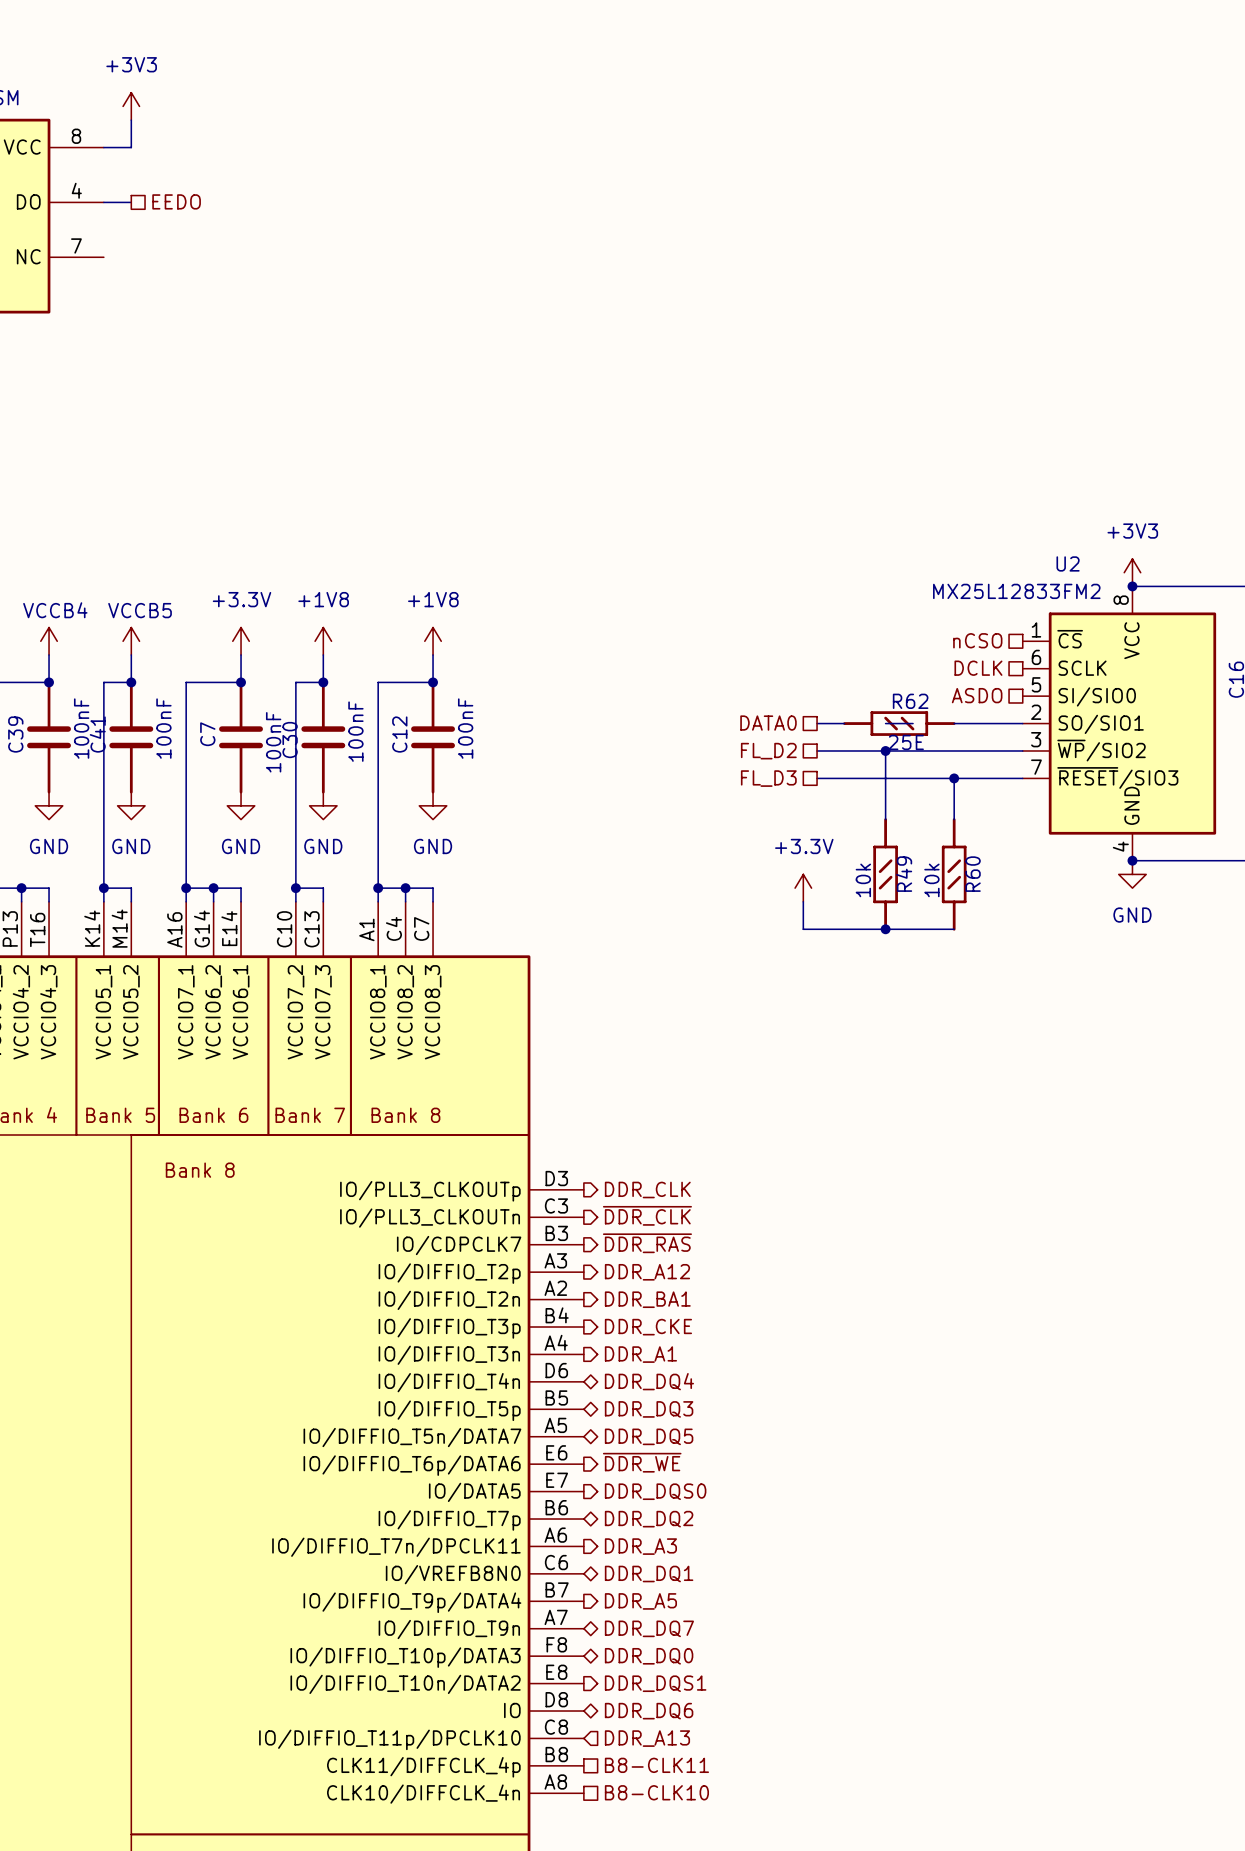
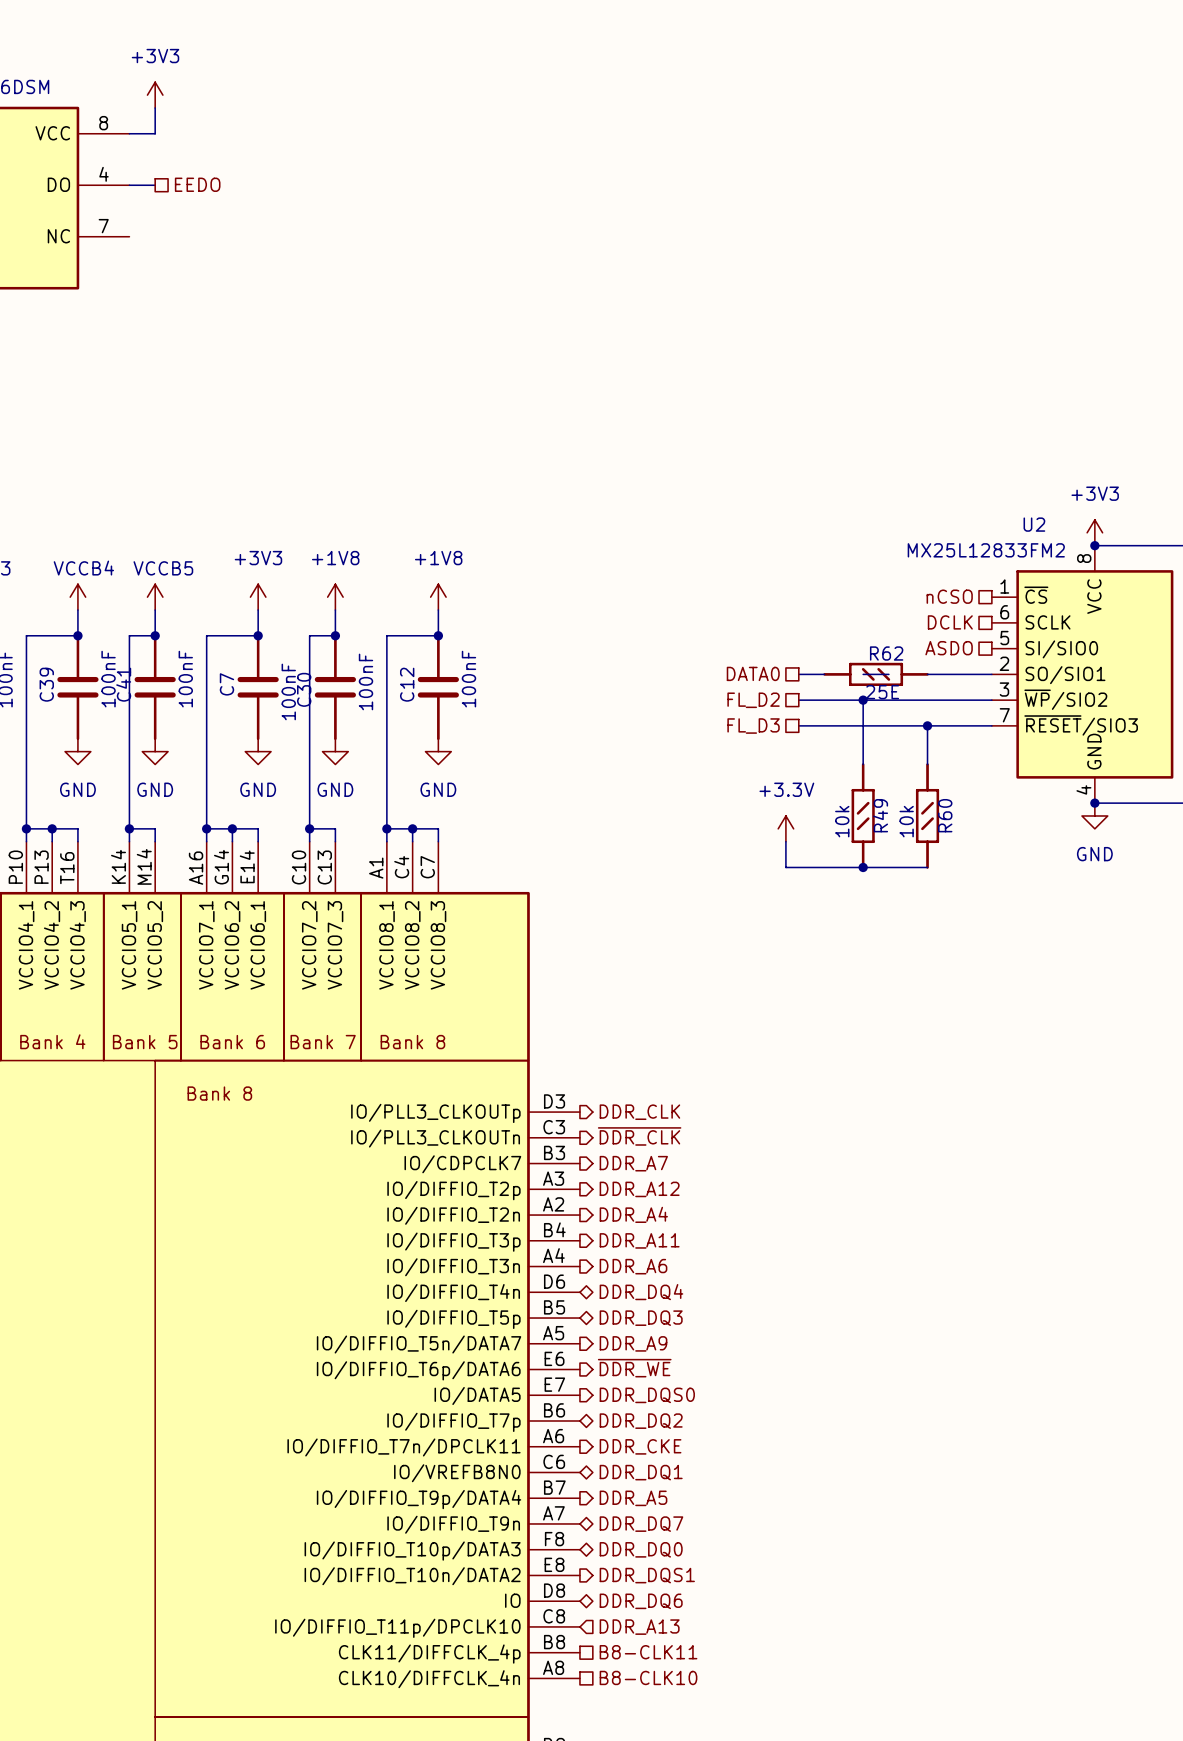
power symbol: +3.3V (241, 641) -> +3V3 (258, 597)
hierarchical label: ~{DDR_RAS} (647, 1243) -> DDR_A7 (633, 1163)
hierarchical label: DDR_BA1 (647, 1299) -> DDR_A4 (633, 1214)
hierarchical label: DDR_CKE (648, 1327) -> DDR_A11 (639, 1240)
hierarchical label: DDR_A1 (640, 1354) -> DDR_A6 (633, 1266)
hierarchical label shape: bidirectional (649, 1436) -> output (633, 1343)
hierarchical label: DDR_DQ5 (649, 1436) -> DDR_A9 (633, 1343)
hierarchical label: DDR_A3 (640, 1546) -> DDR_CKE (640, 1446)

